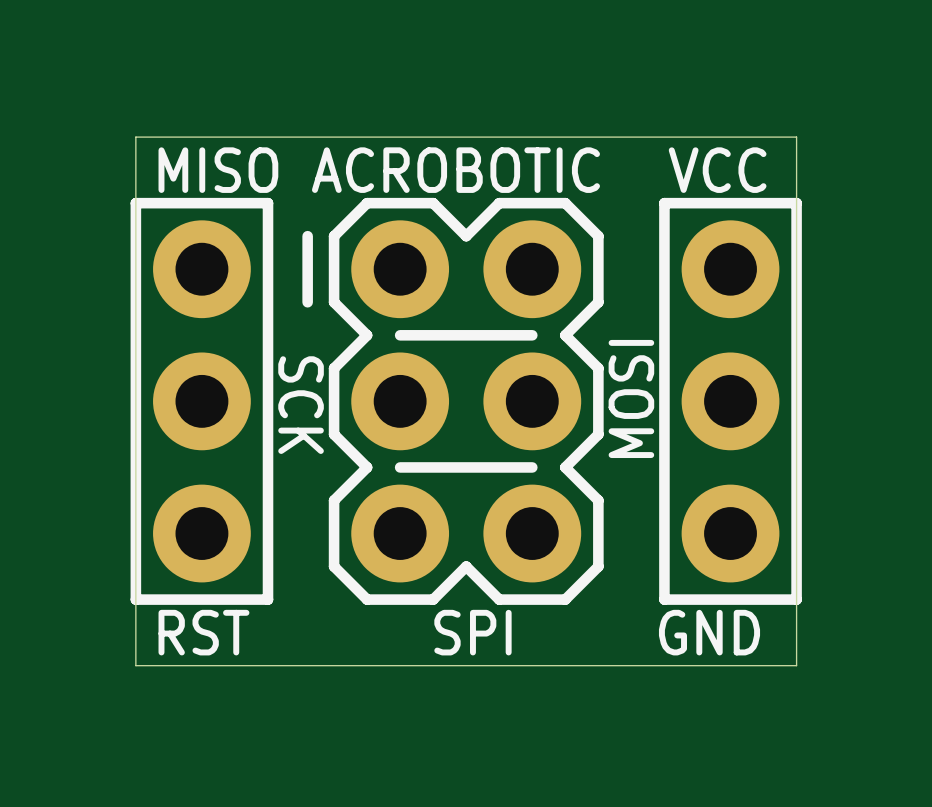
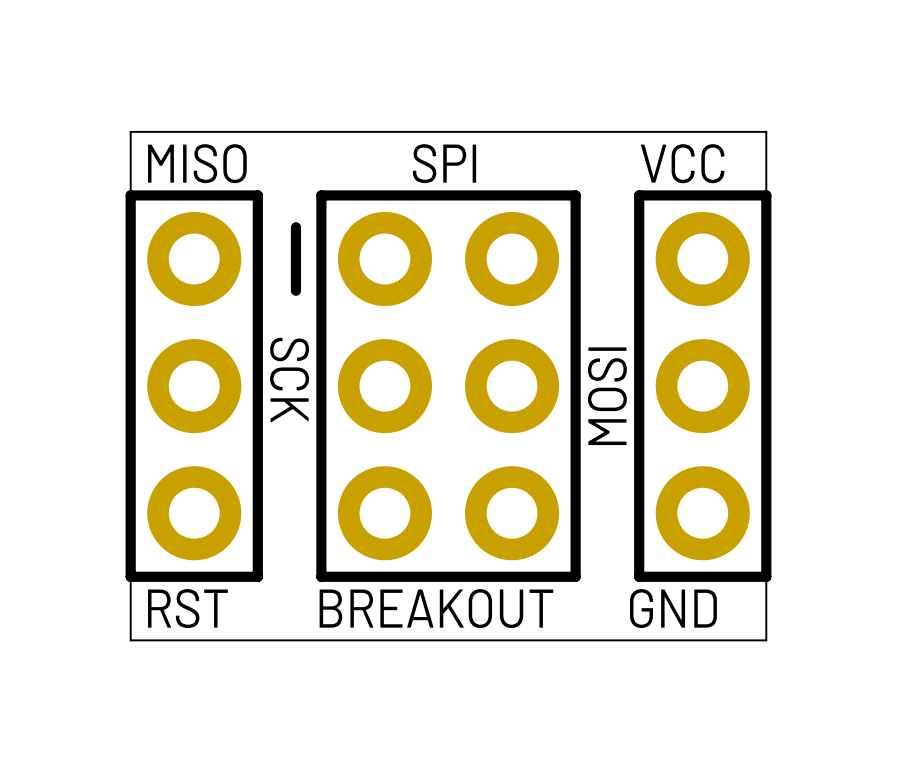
text: ACROBOTIC (455, 170) -> none
part footprint: [302, 197, 604, 605] -> [290, 190, 581, 582]
text: none -> BREAKOUT (436, 608)
text position: SPI (472, 632) -> SPI (444, 163)

